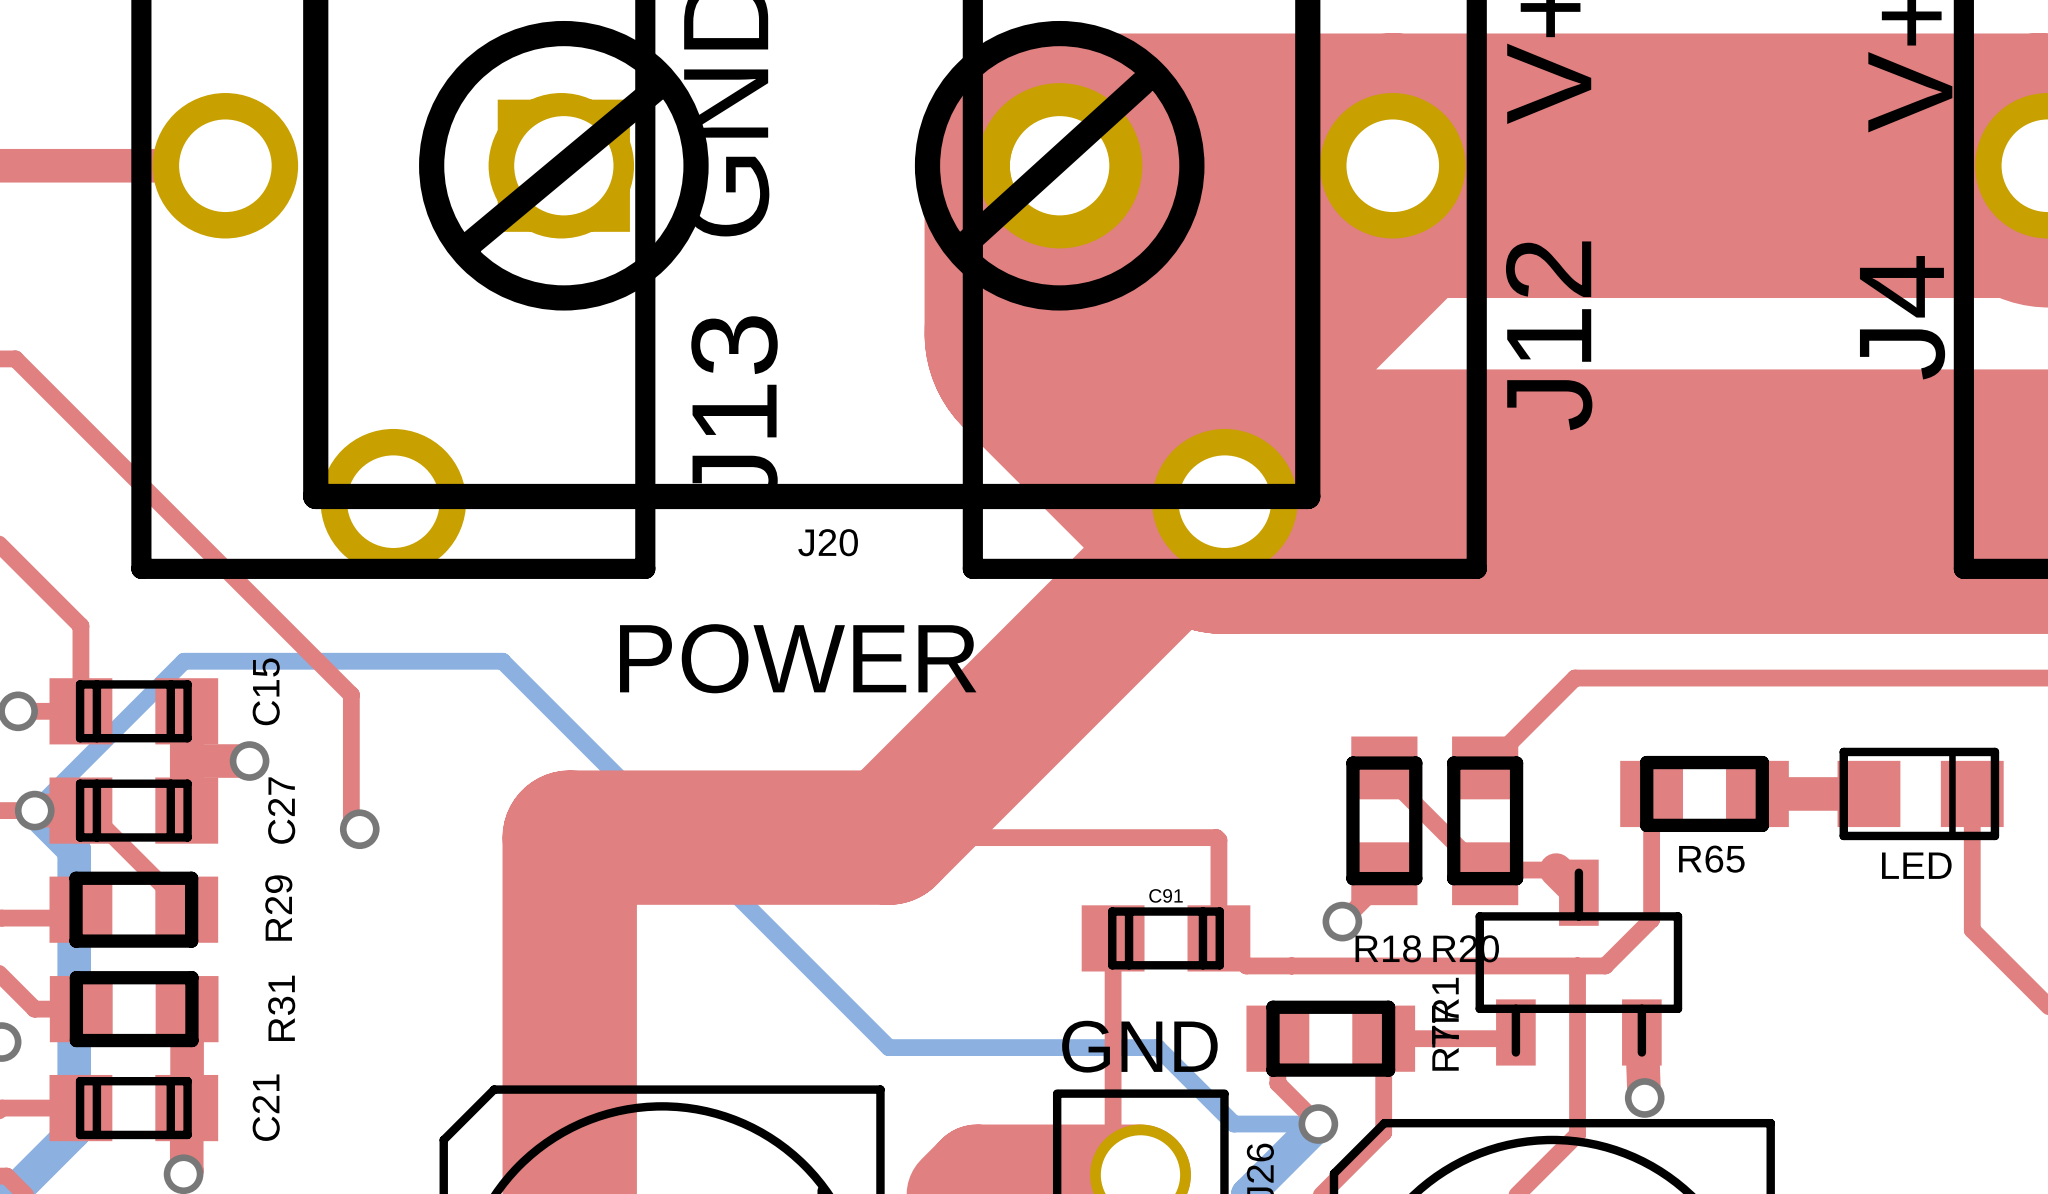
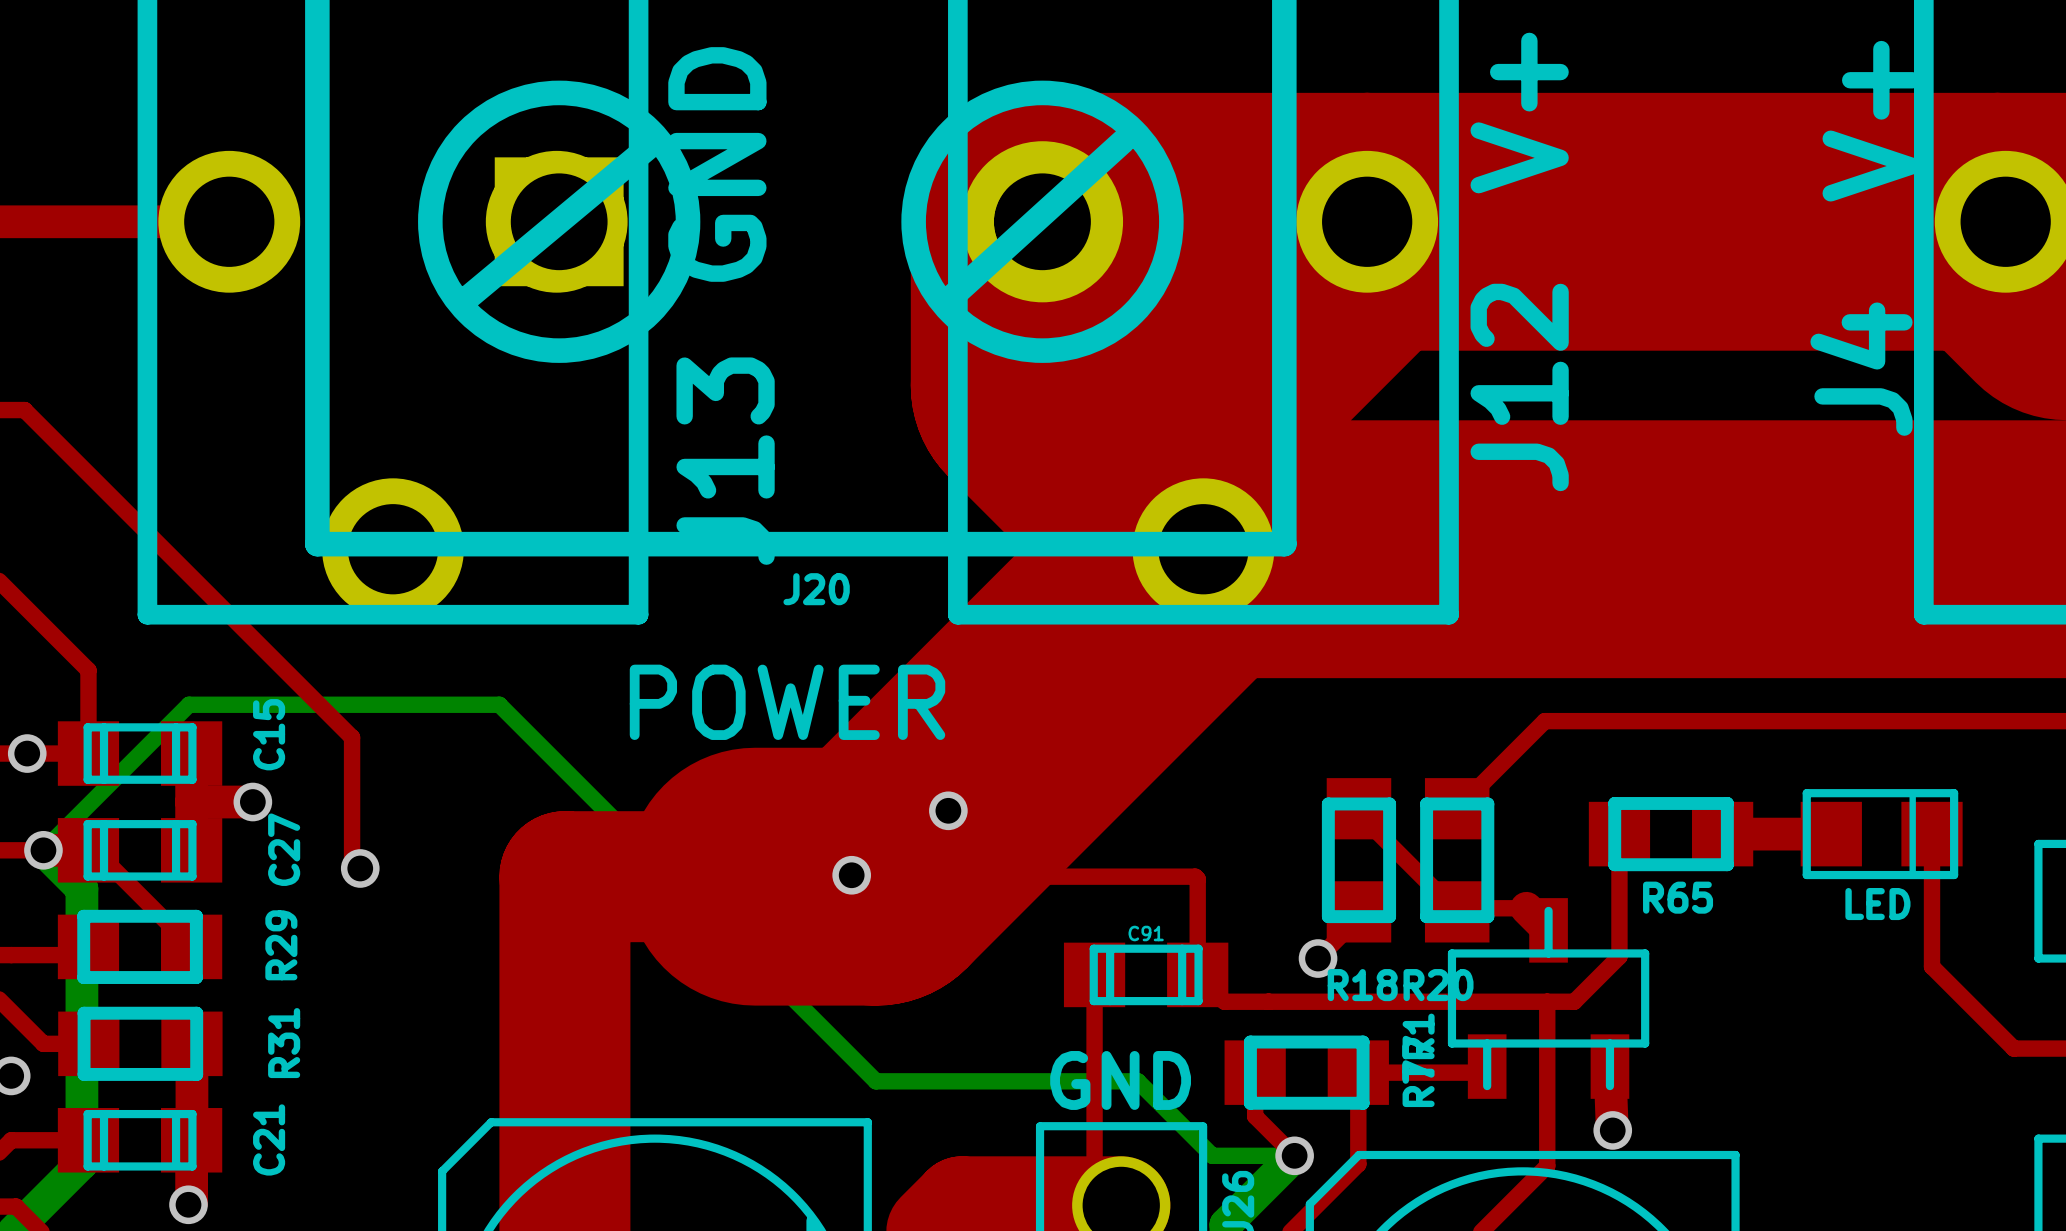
top track width: thin (1224, 501) (888, 837) (764, 837) -> thick (1203, 549) (875, 876) (755, 876)
via: none -> (948, 810)
via: none -> (851, 875)

